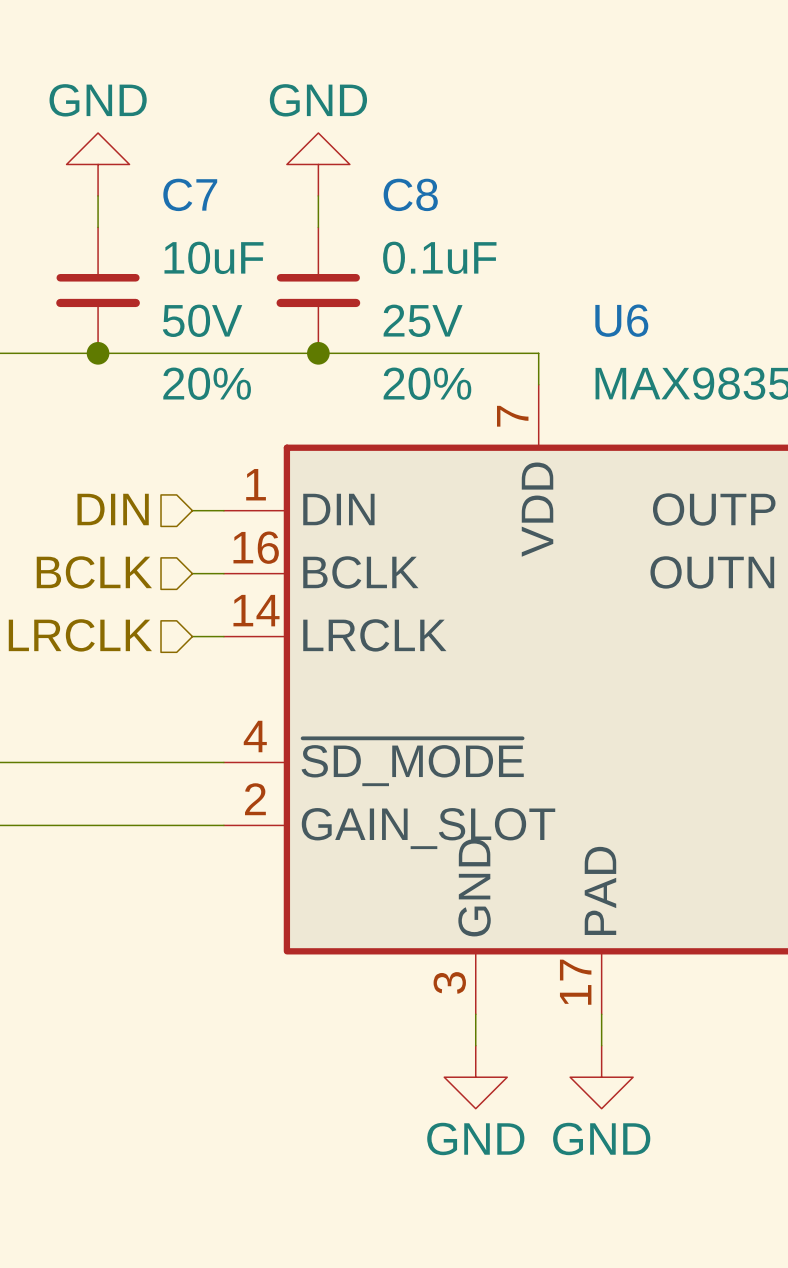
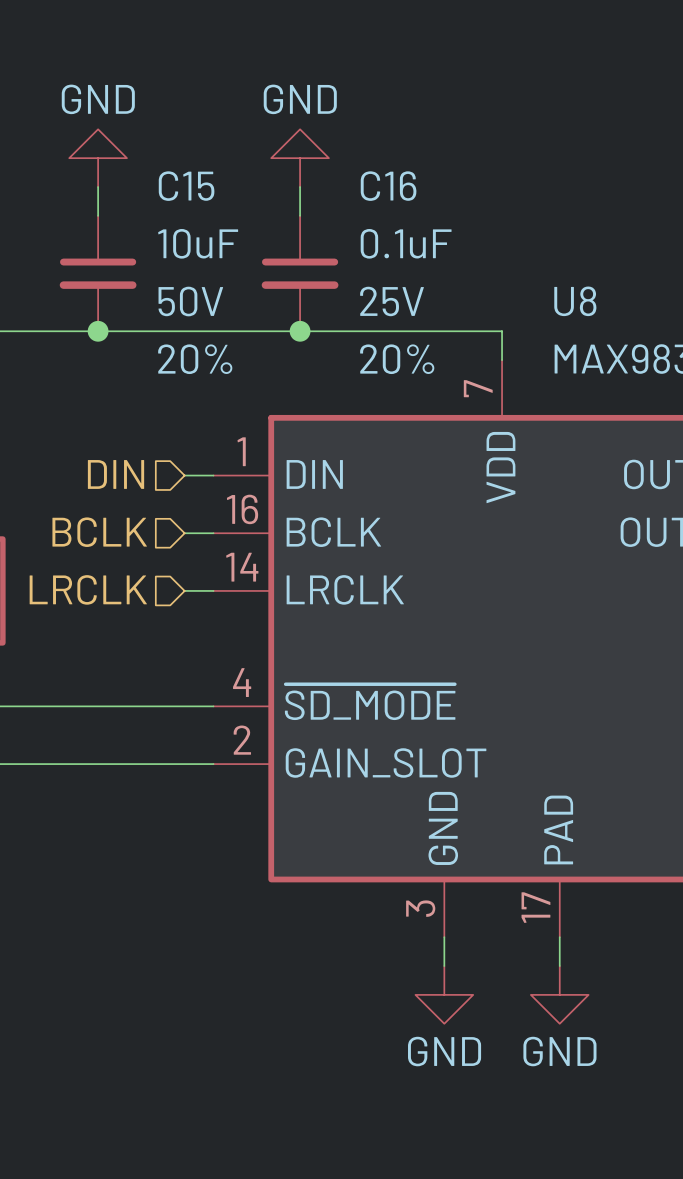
C7 name: C7 (190, 194) -> C15 (186, 186)
C8 name: C8 (410, 194) -> C16 (388, 186)
U6 name: U6 (621, 320) -> U8 (575, 301)

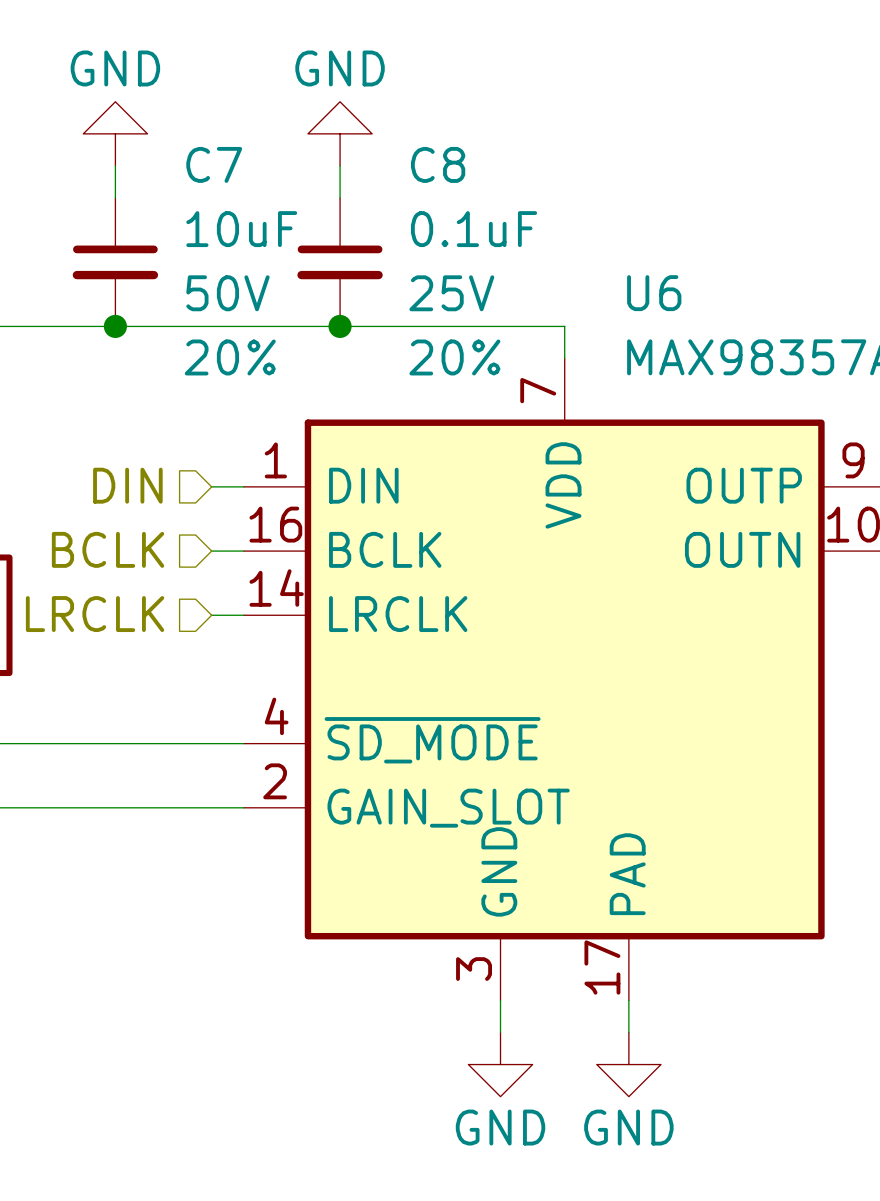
C15 name: C15 (186, 186) -> C7 (214, 164)
C16 name: C16 (388, 186) -> C8 (438, 164)
U8 name: U8 (575, 301) -> U6 (654, 293)

